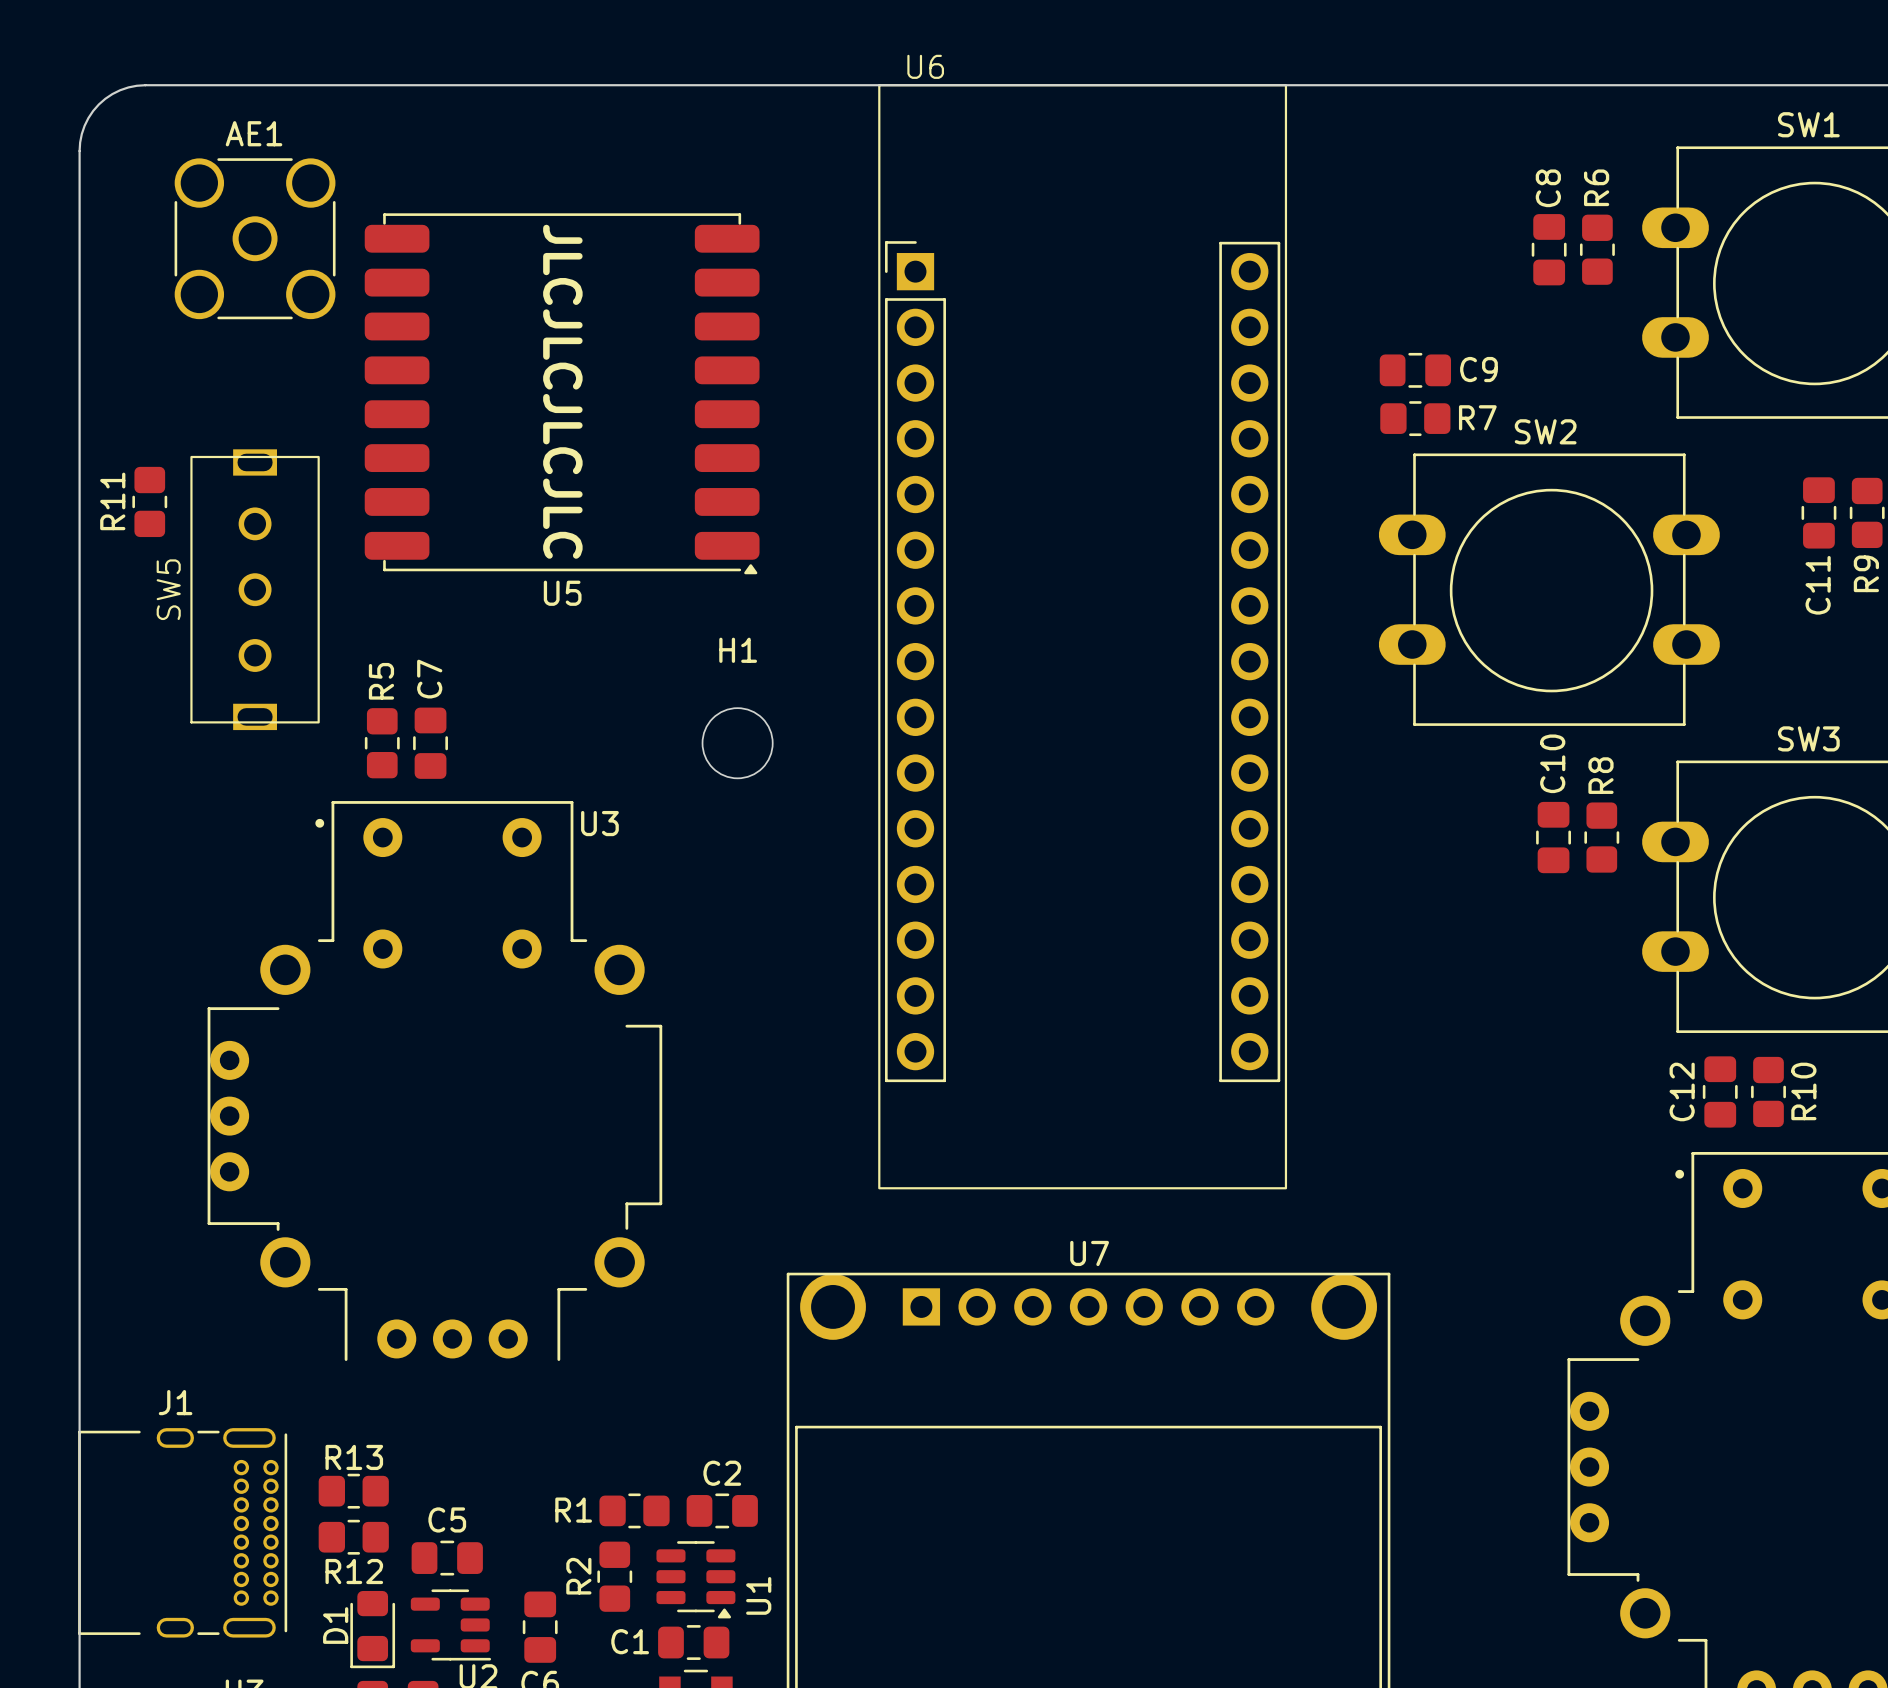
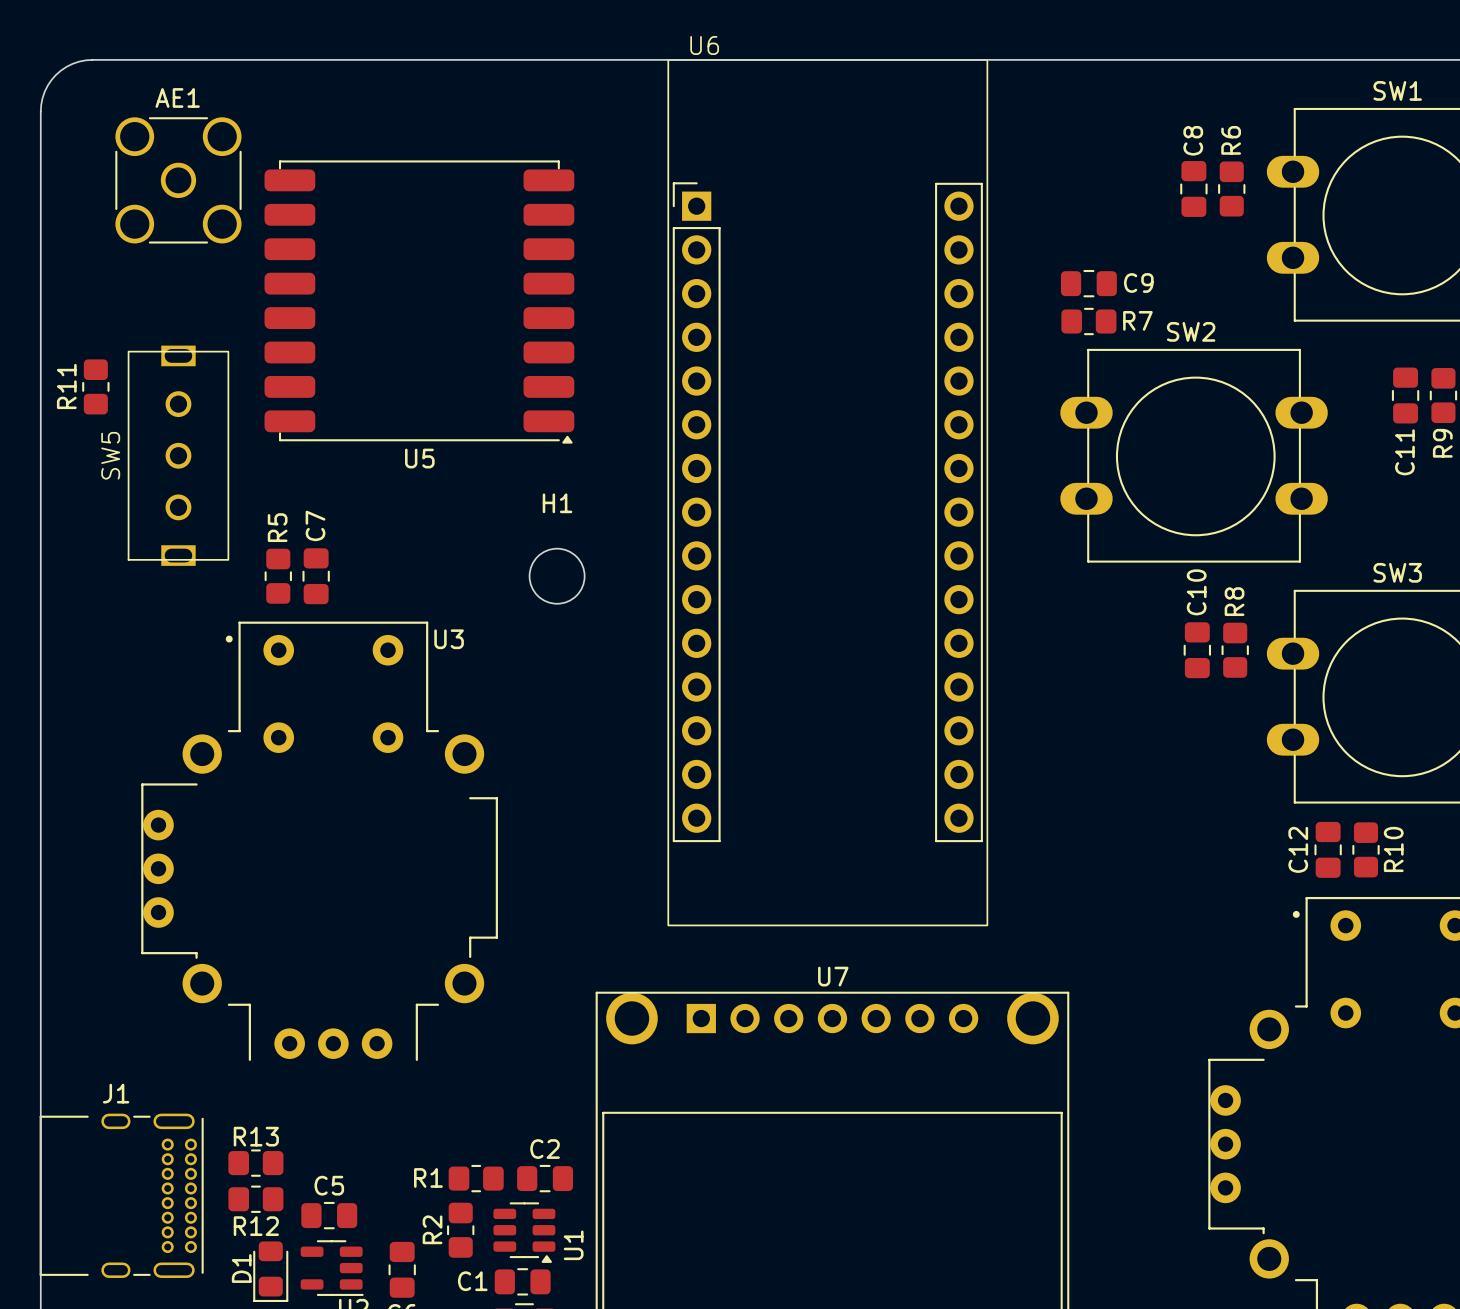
text: JLCJLCJLCJLC (562, 391) -> none

